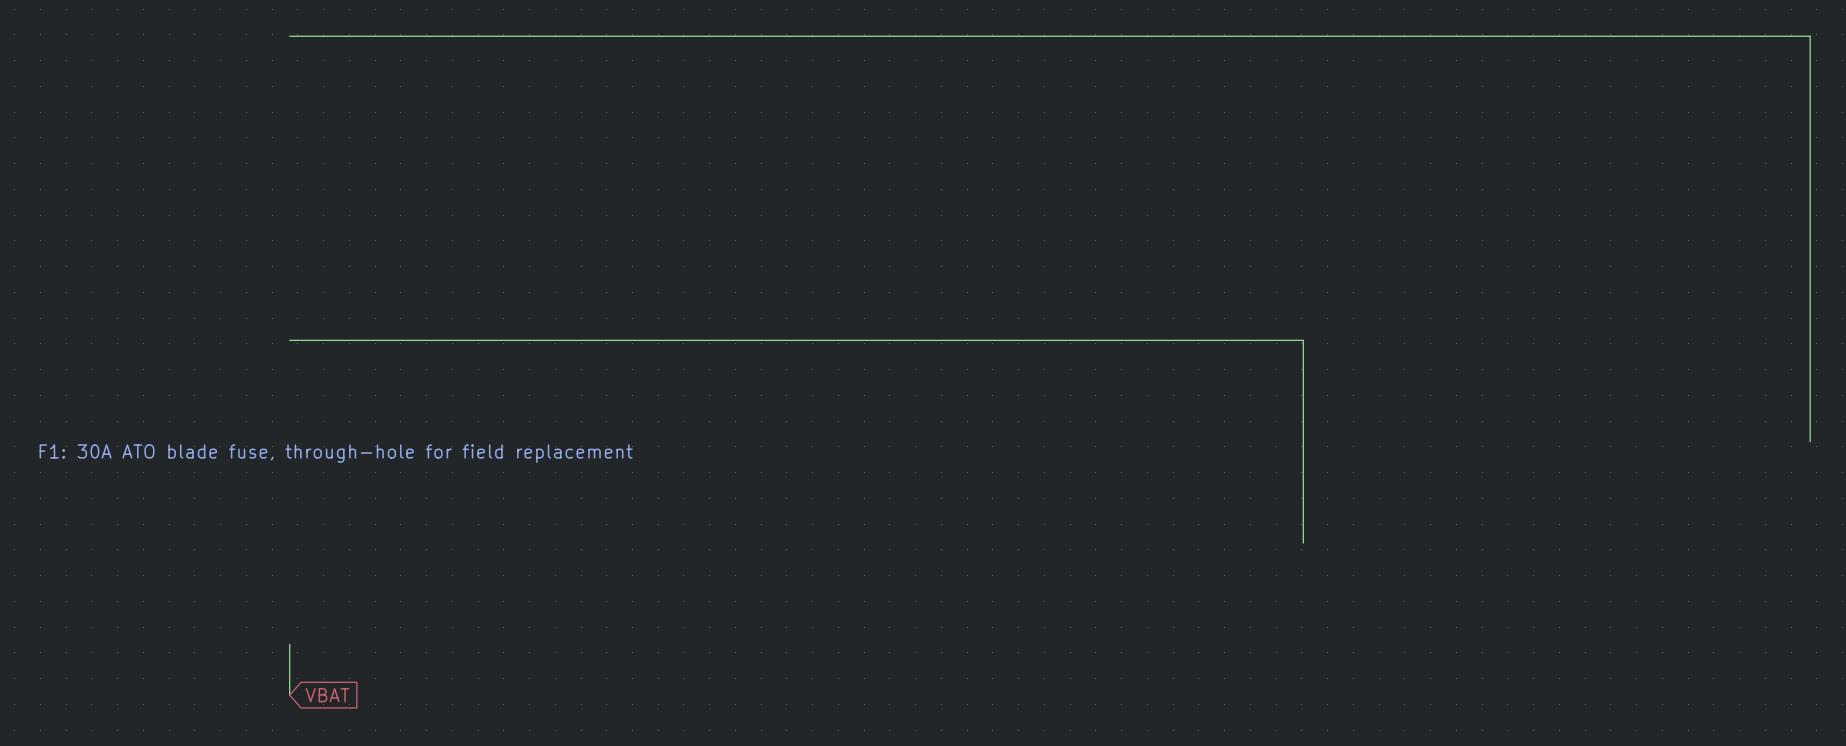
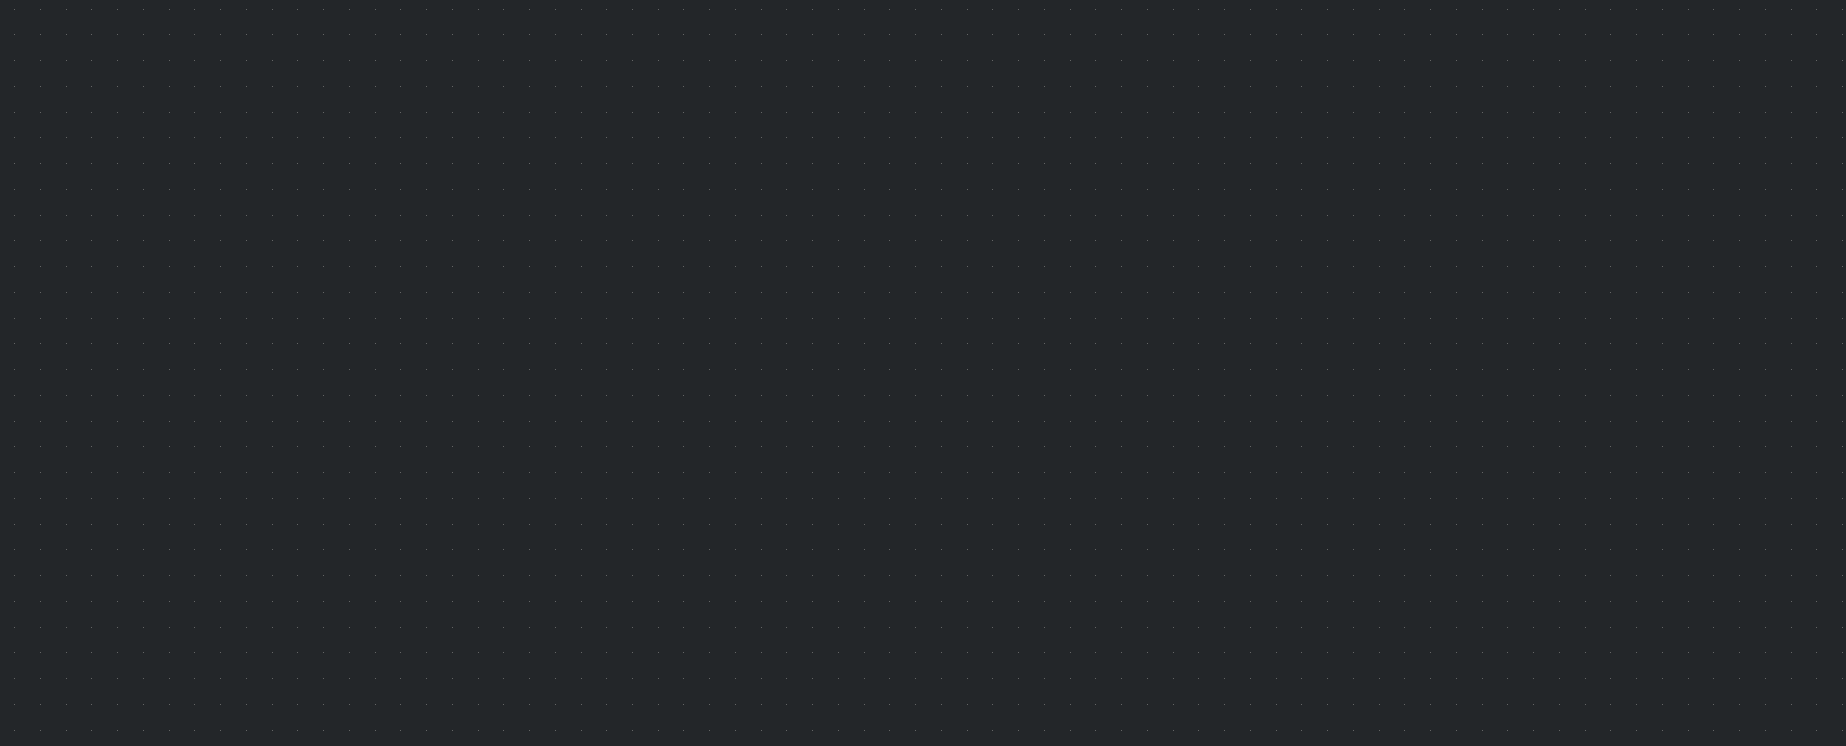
wire: (289, 36) (1810, 36) (1810, 441) -> none
wire: (289, 340) (1303, 340) (1303, 543) -> none
text: F1: 30A ATO blade fuse, through-hole for field replacement (336, 453) -> none
wire: (289, 644) (289, 695) -> none
global label: VBAT (327, 695) -> none

